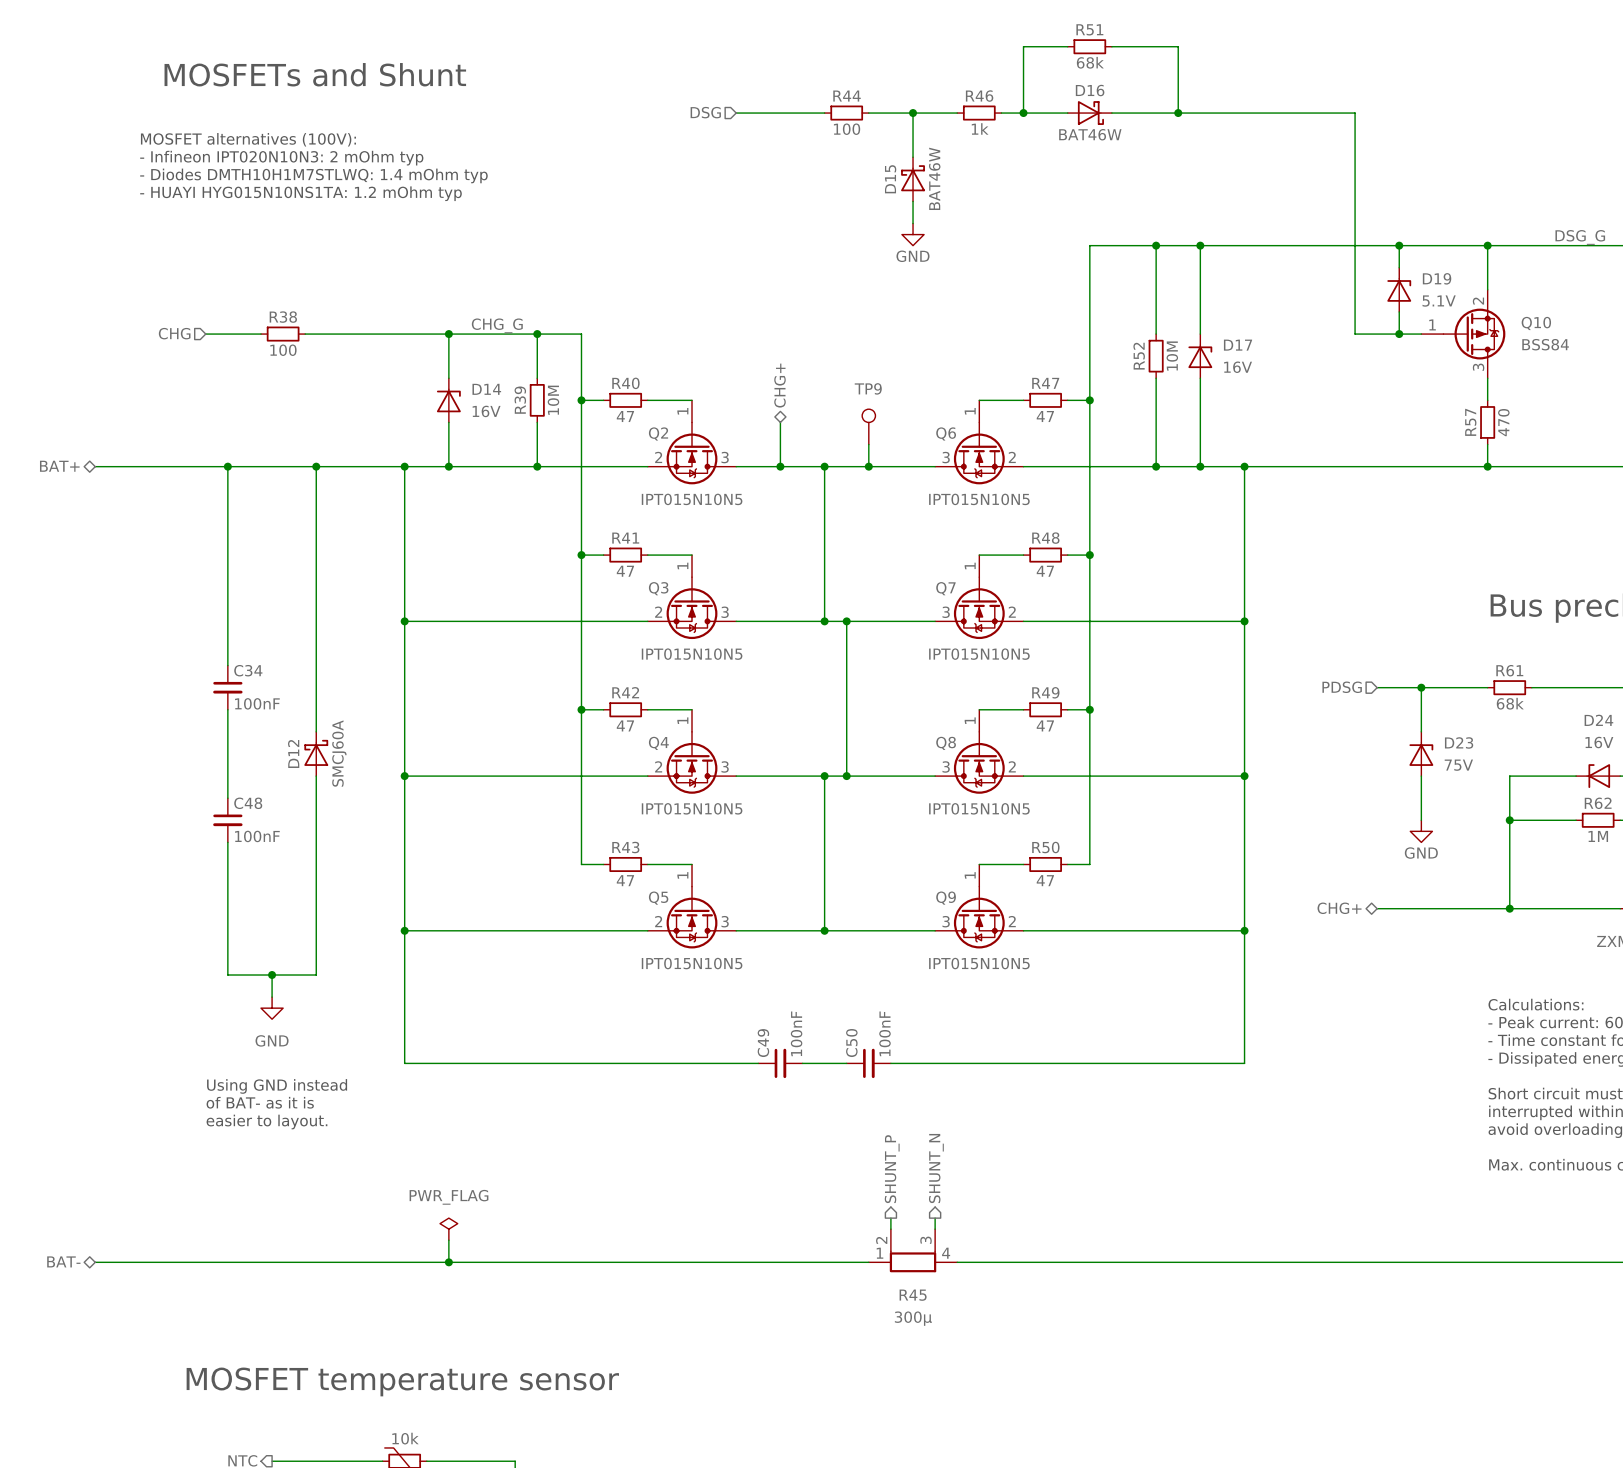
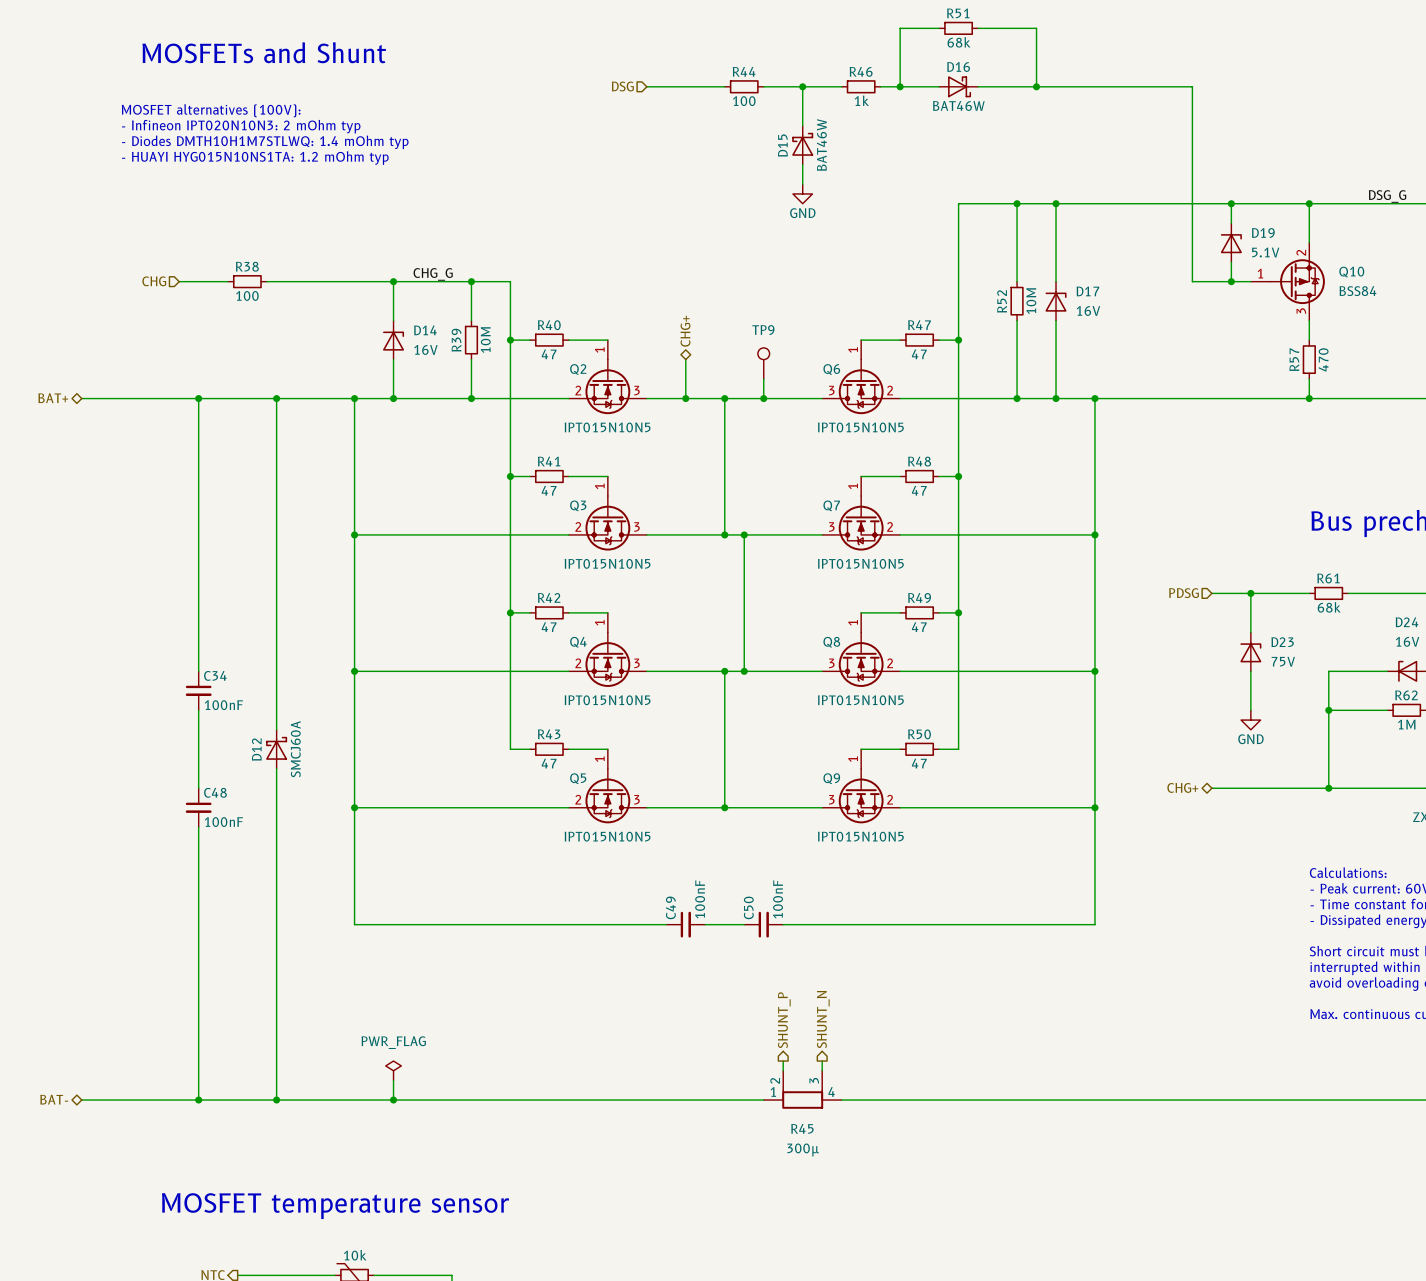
C34 position: (227, 687) -> (198, 690)
D12 position: (316, 753) -> (276, 749)
C48 position: (227, 820) -> (198, 807)
wire: (227, 975) (316, 975) -> (198, 846) (198, 1100)
wire: (272, 975) (272, 997) -> none
junction: (272, 975) -> none
wire: none -> (276, 846) (276, 1100)
power symbol: GND (272, 1008) -> none
text: Using GND instead (277, 1086) -> none
text: of BAT- as it is (260, 1102) -> none
text: easier to layout. (266, 1122) -> none
junction: none -> (198, 1100)
junction: none -> (276, 1100)

